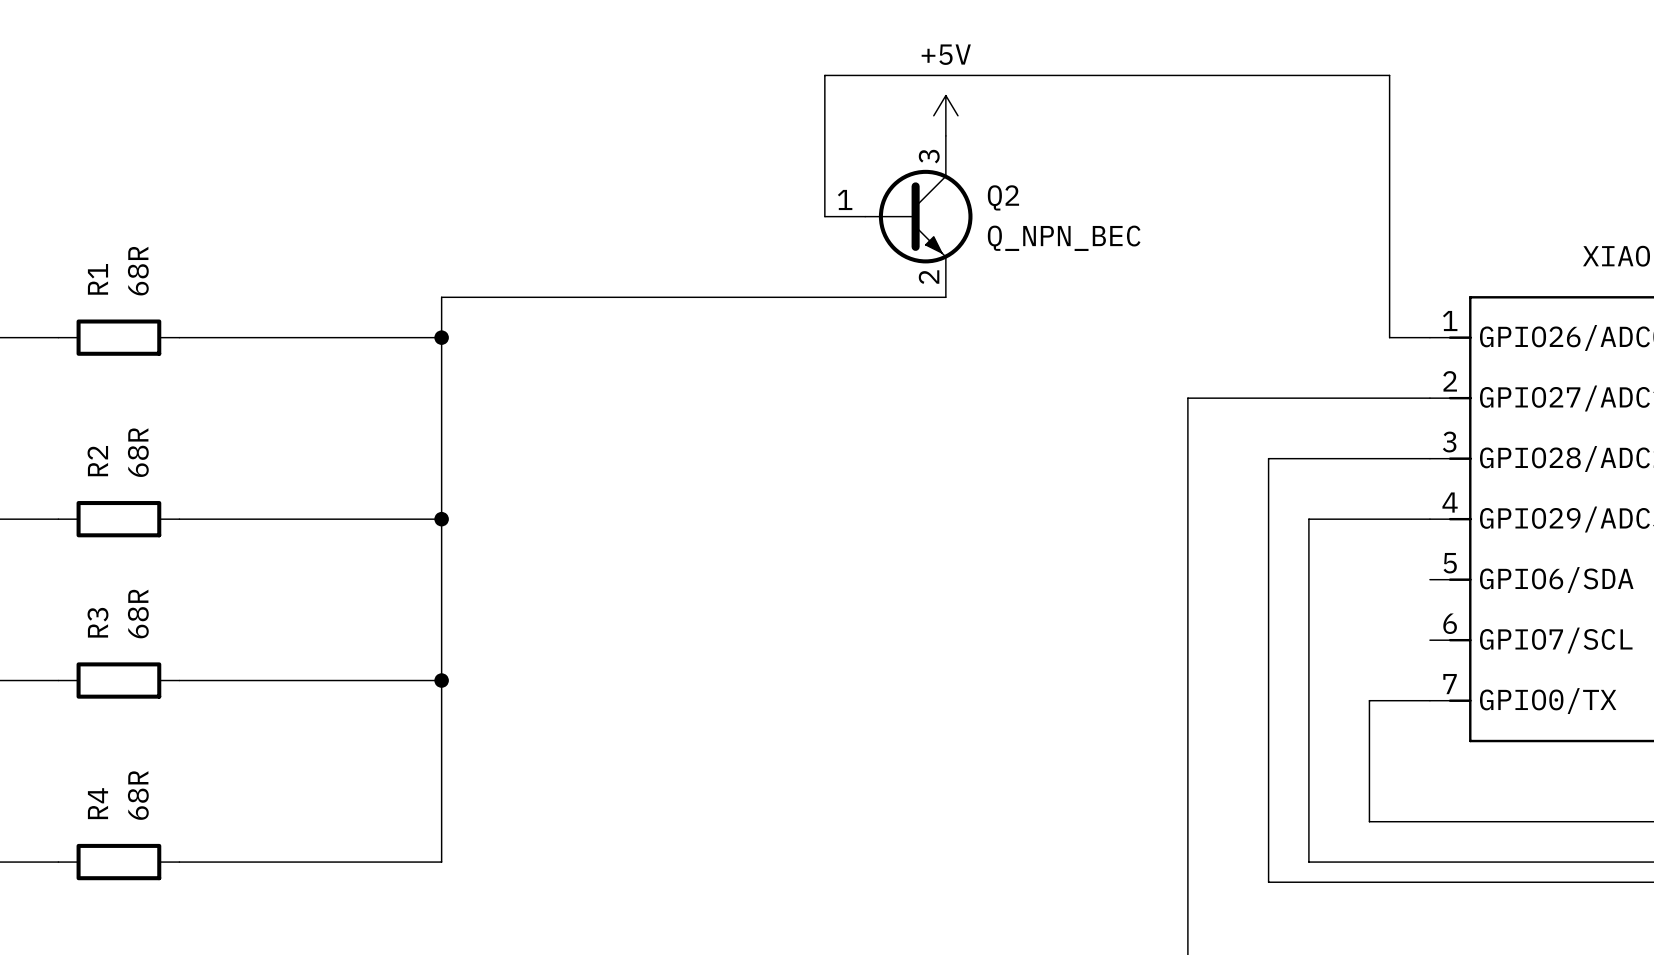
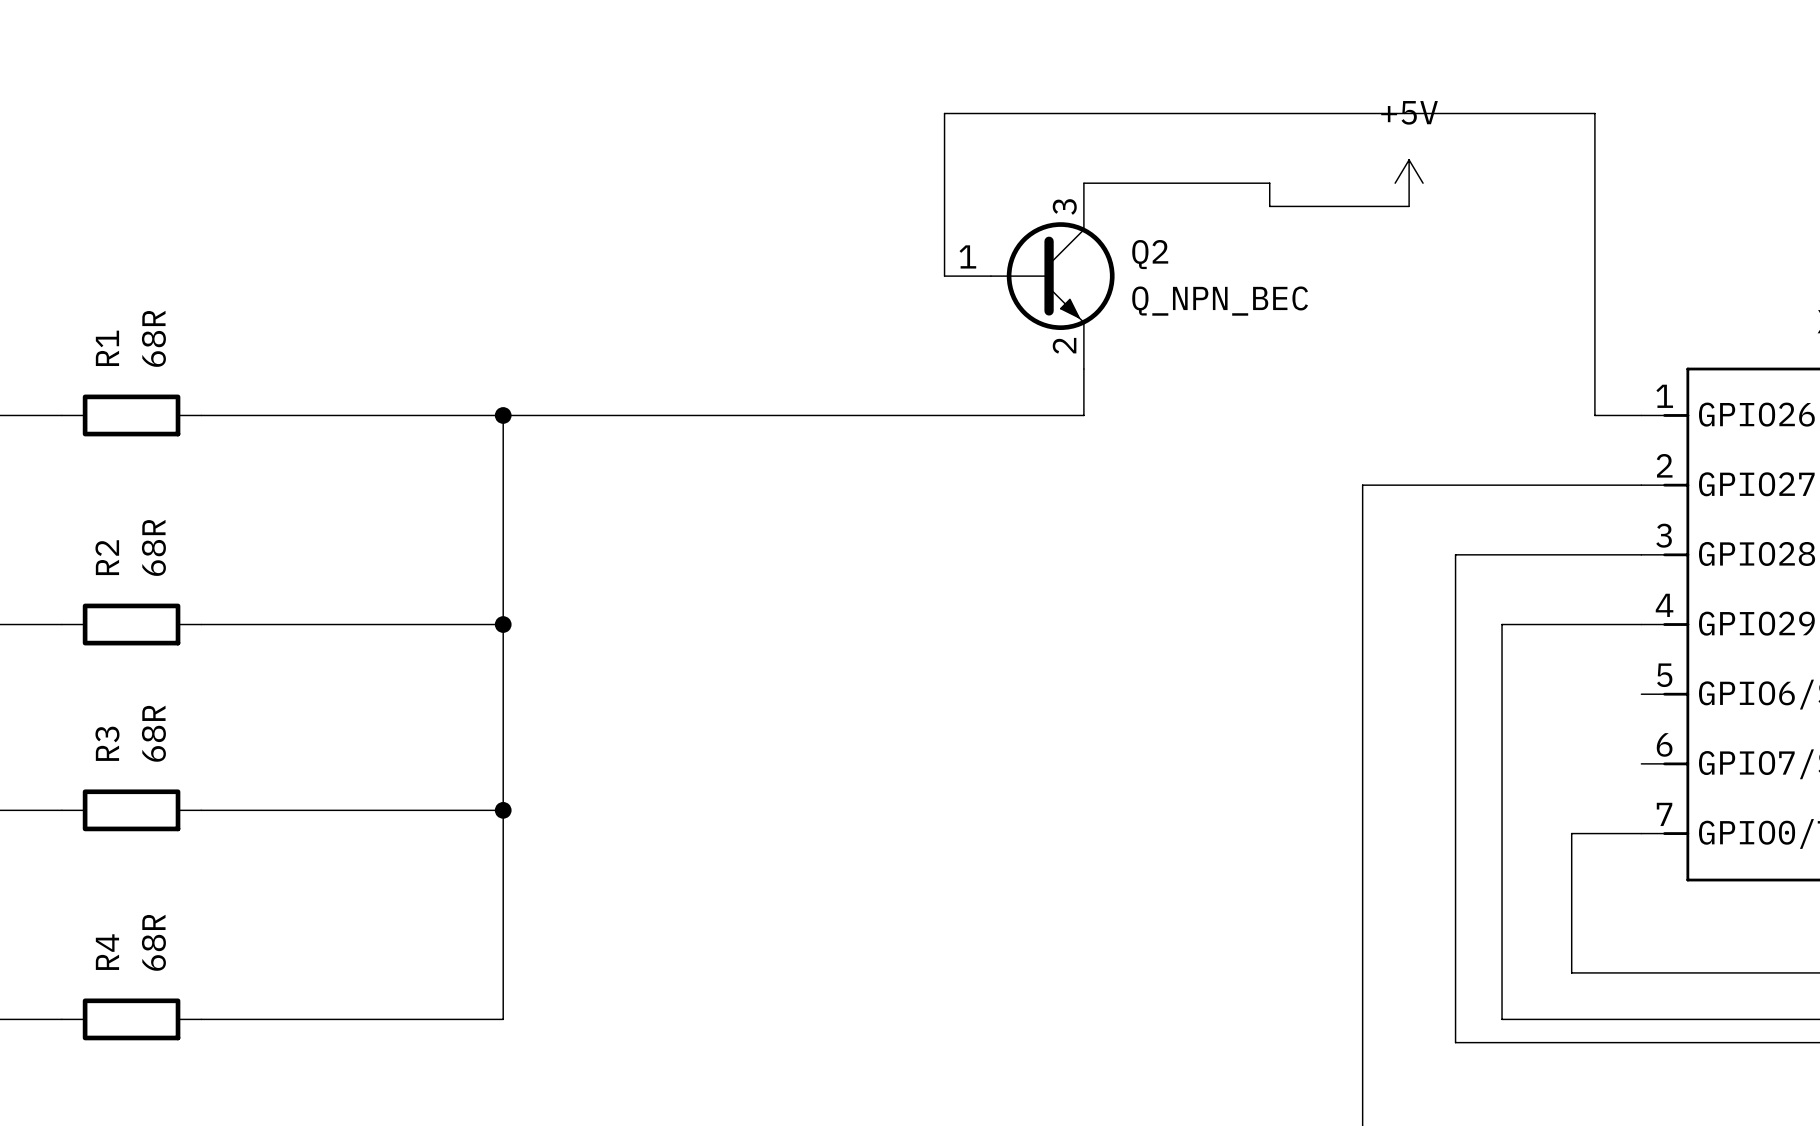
power symbol position: +5V (945, 115) -> +5V (1409, 183)
wire: none -> (1083, 183) (1269, 183) (1269, 206) (1409, 206)
wire: (945, 297) (441, 297) (441, 337) -> (1083, 369) (1083, 415) (503, 415)

